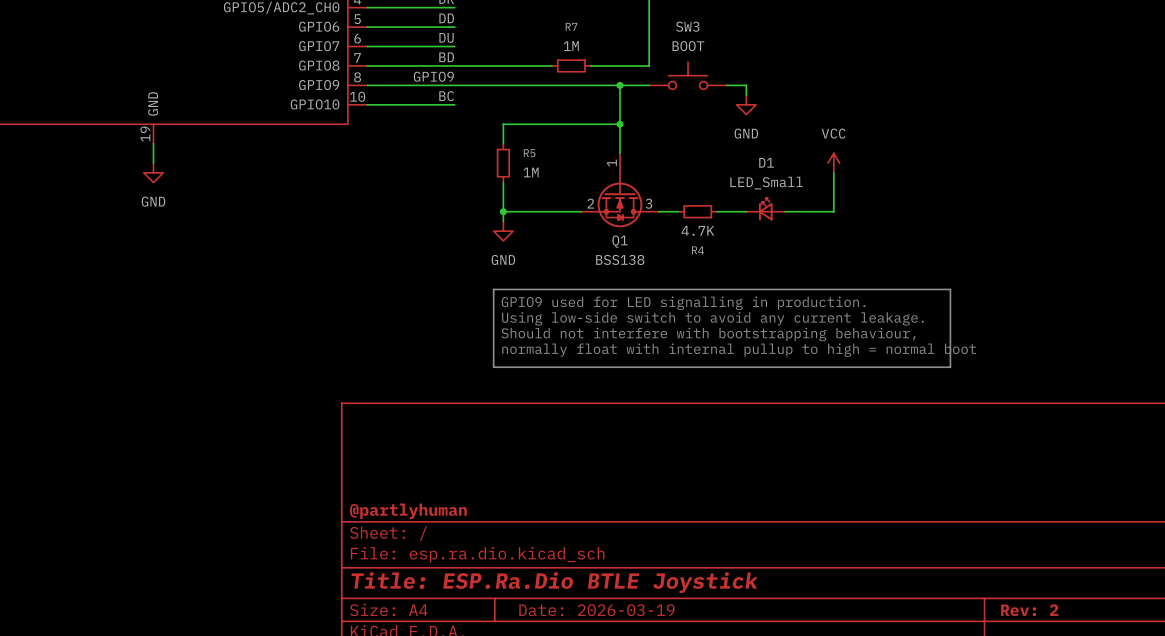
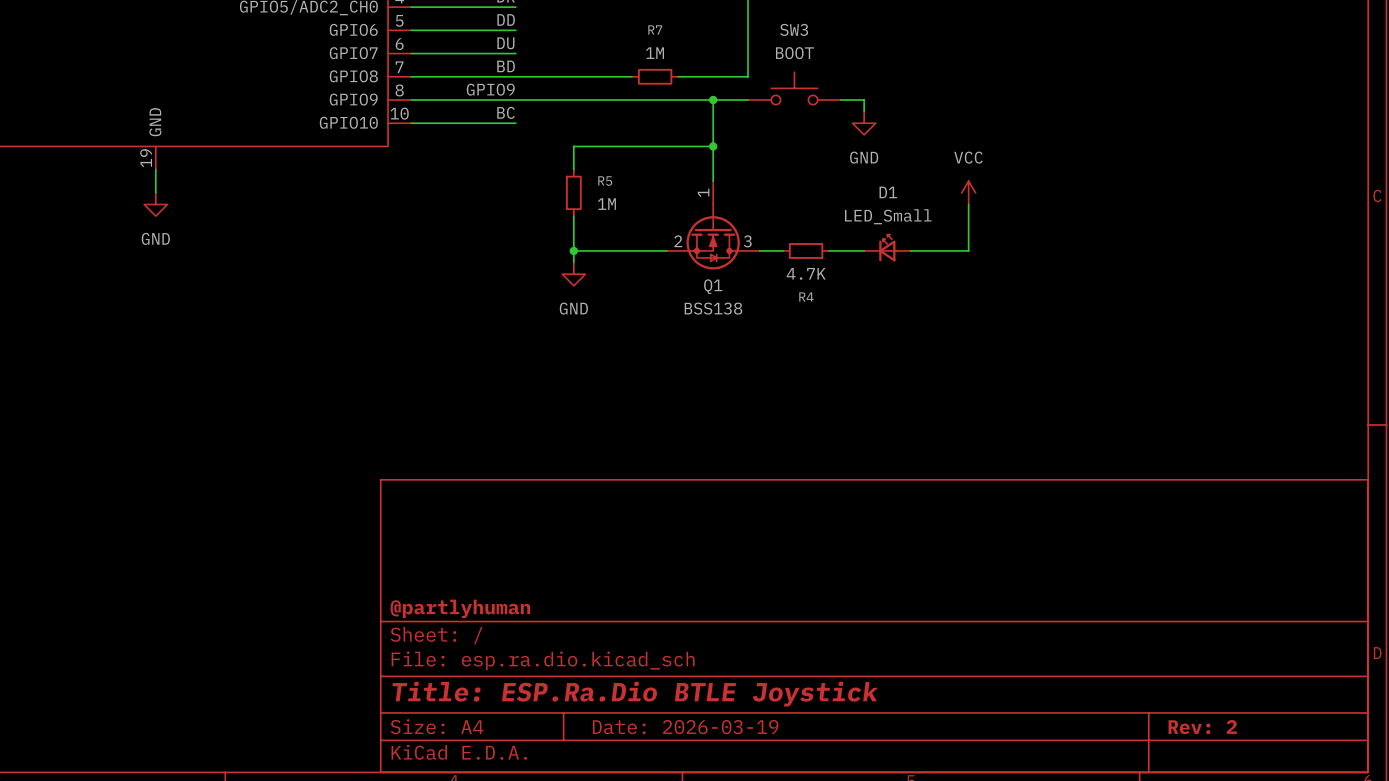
line: (493, 289) (950, 289) (950, 367) (493, 367) (493, 289) -> none
text: GPIO9 used for LED signalling in production. (683, 303) -> none
text: Using low-side switch to avoid any current leakage. (712, 318) -> none
text: Should not interfere with bootstrapping behaviour, (708, 334) -> none
text: normally float with internal pullup to high = normal boot (739, 350) -> none

